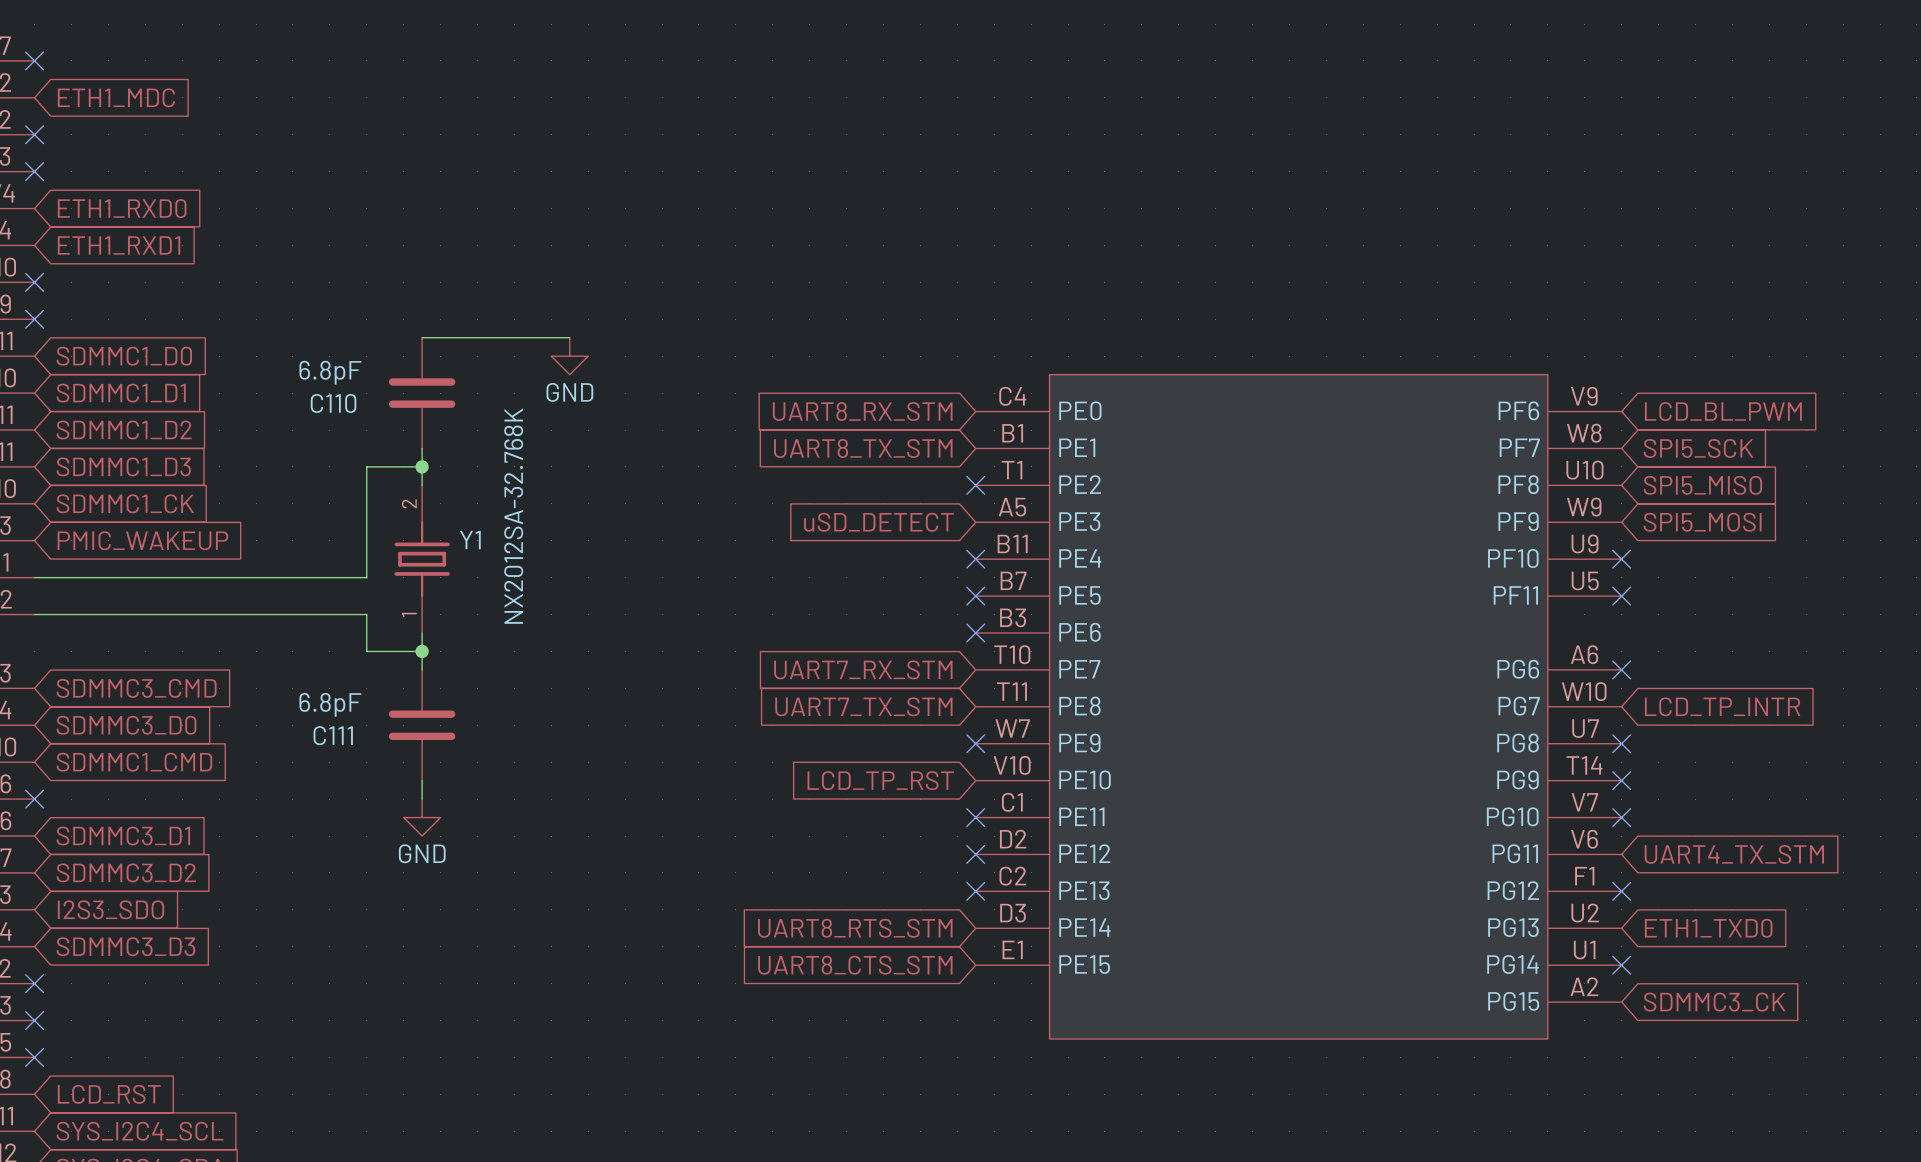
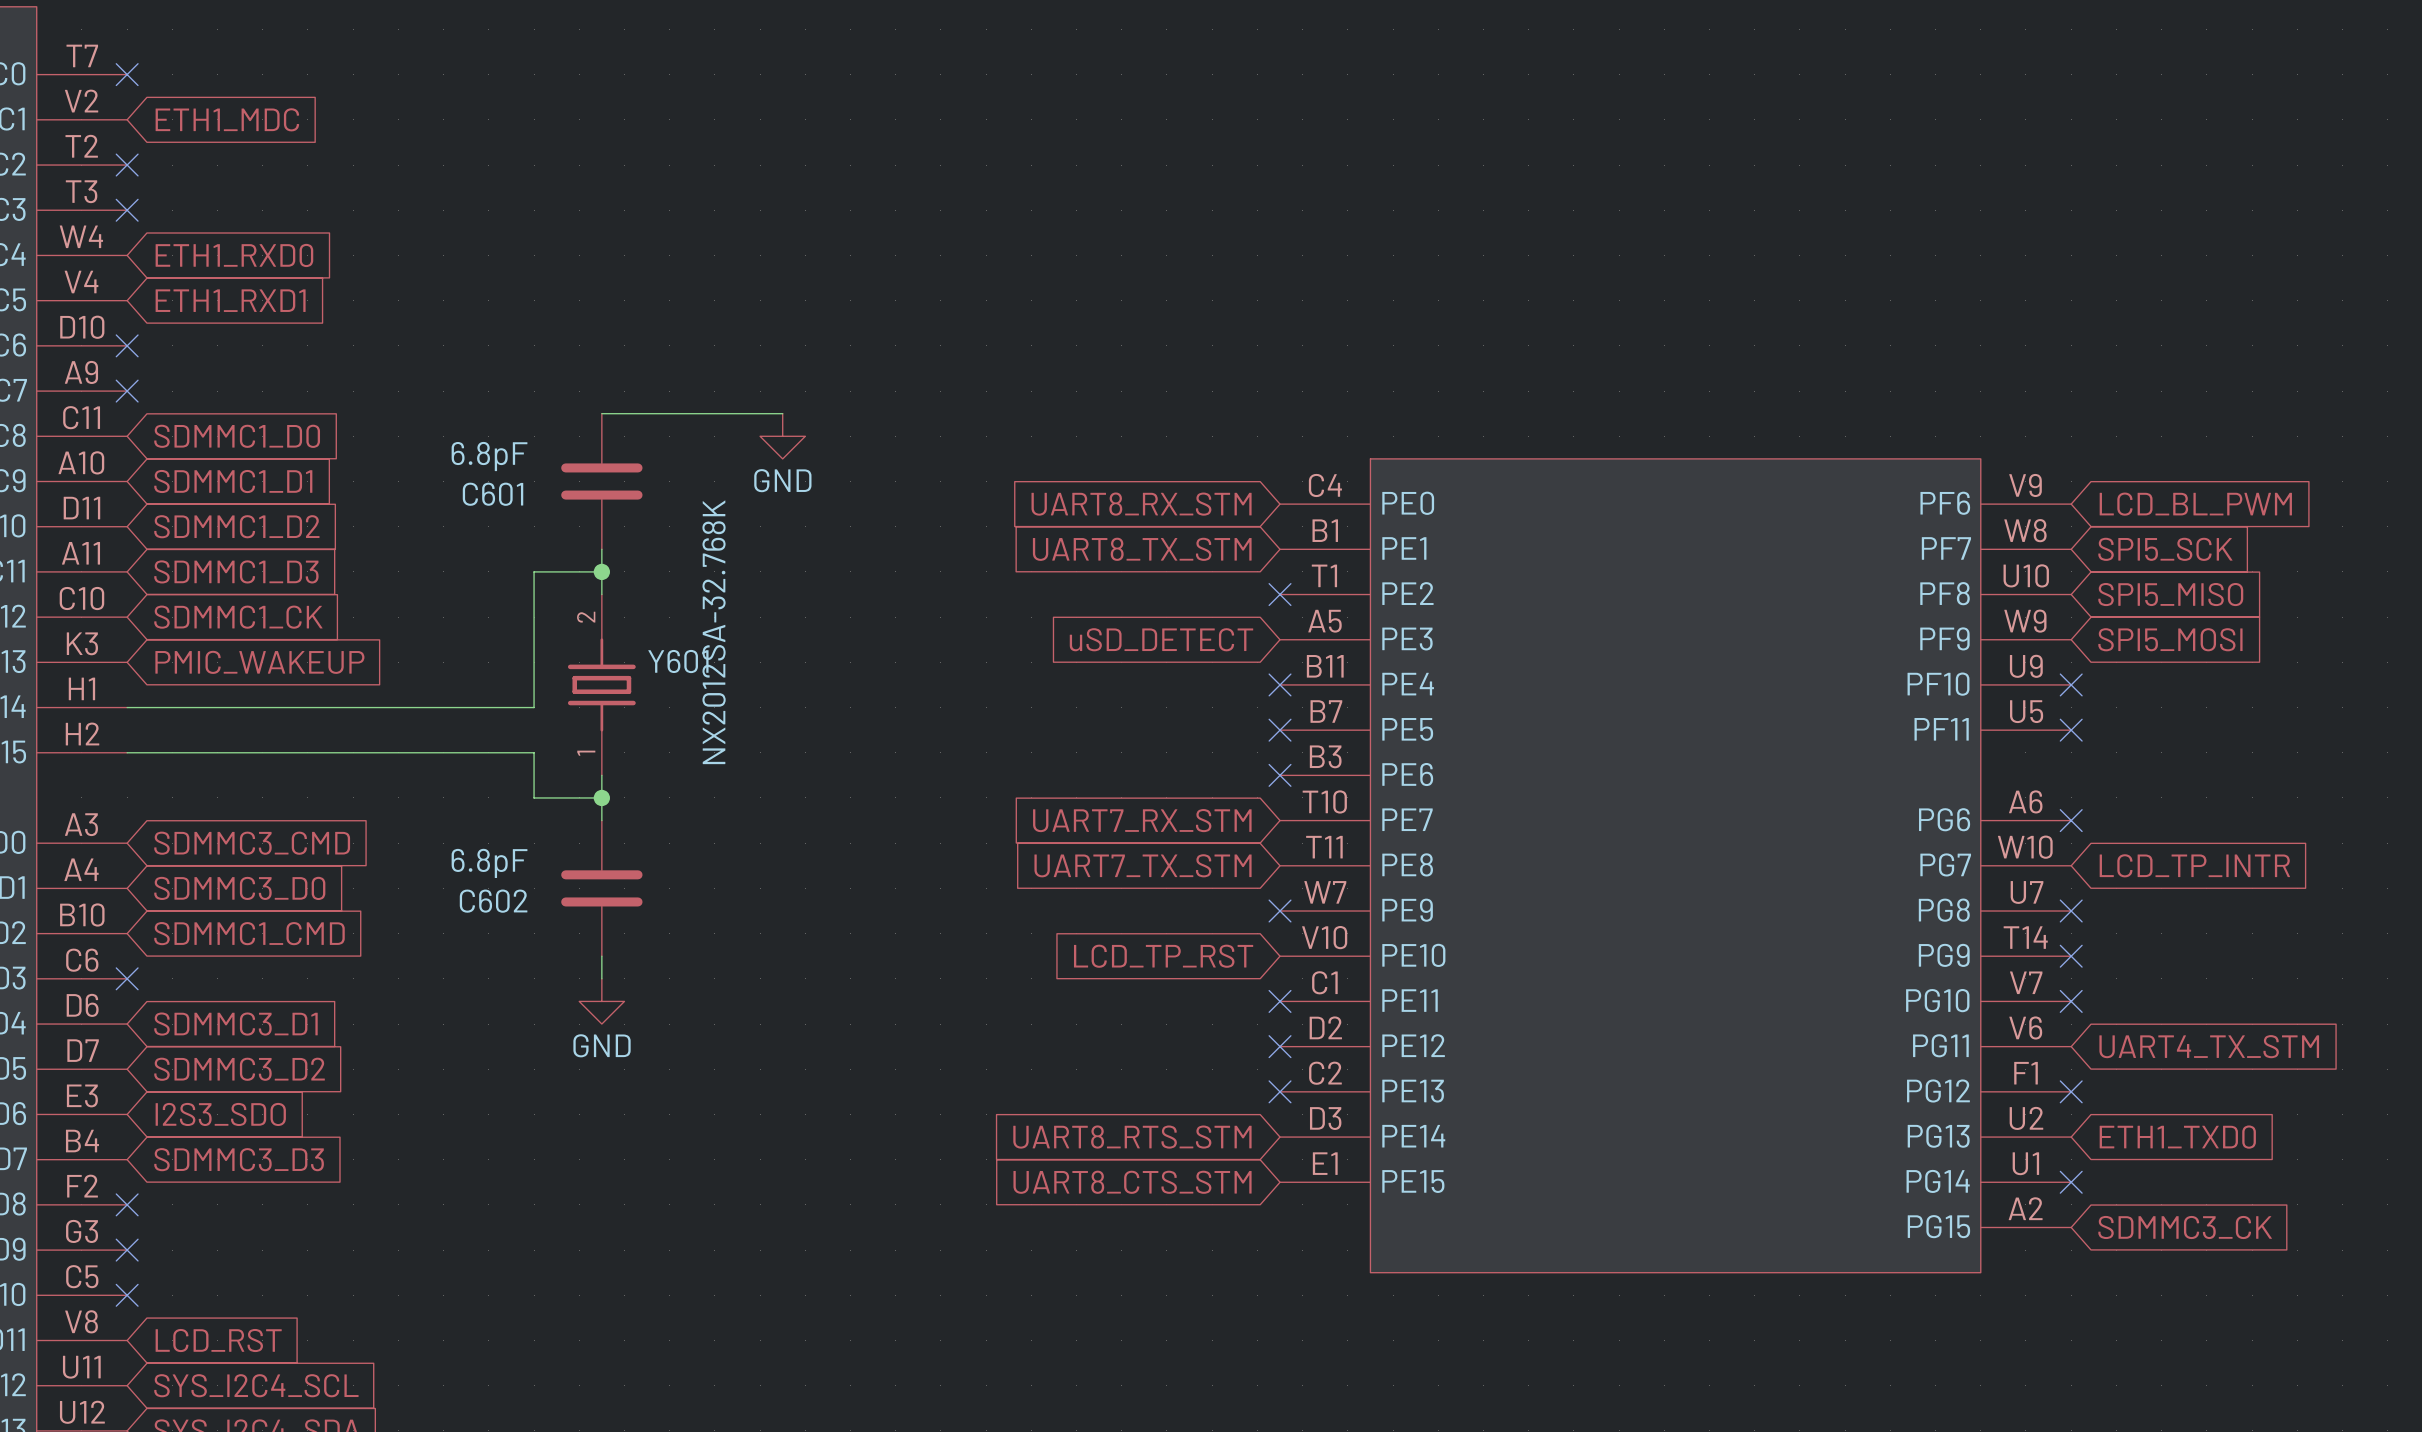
C110 name: C110 (333, 403) -> C601 (493, 494)
Y1 name: Y1 (470, 540) -> Y601 (678, 661)
C111 name: C111 (333, 735) -> C602 (493, 901)

